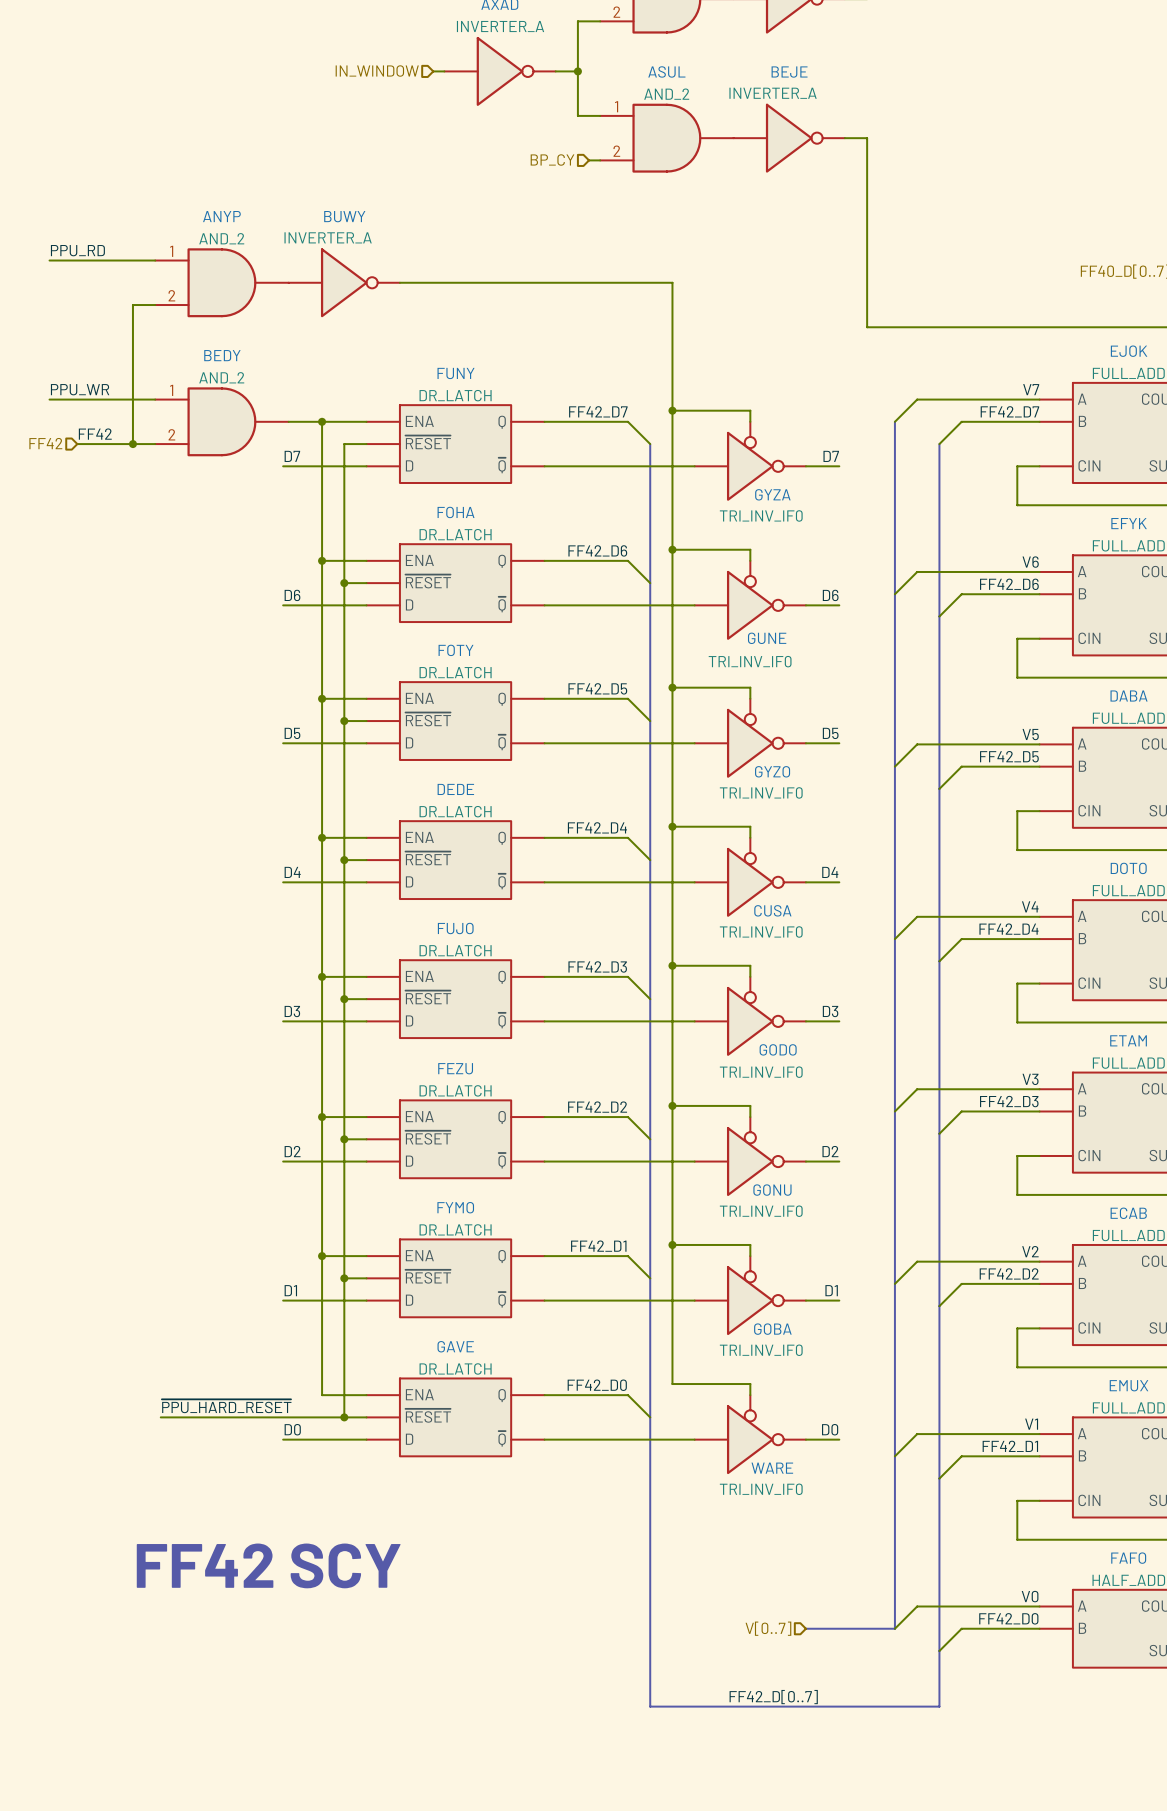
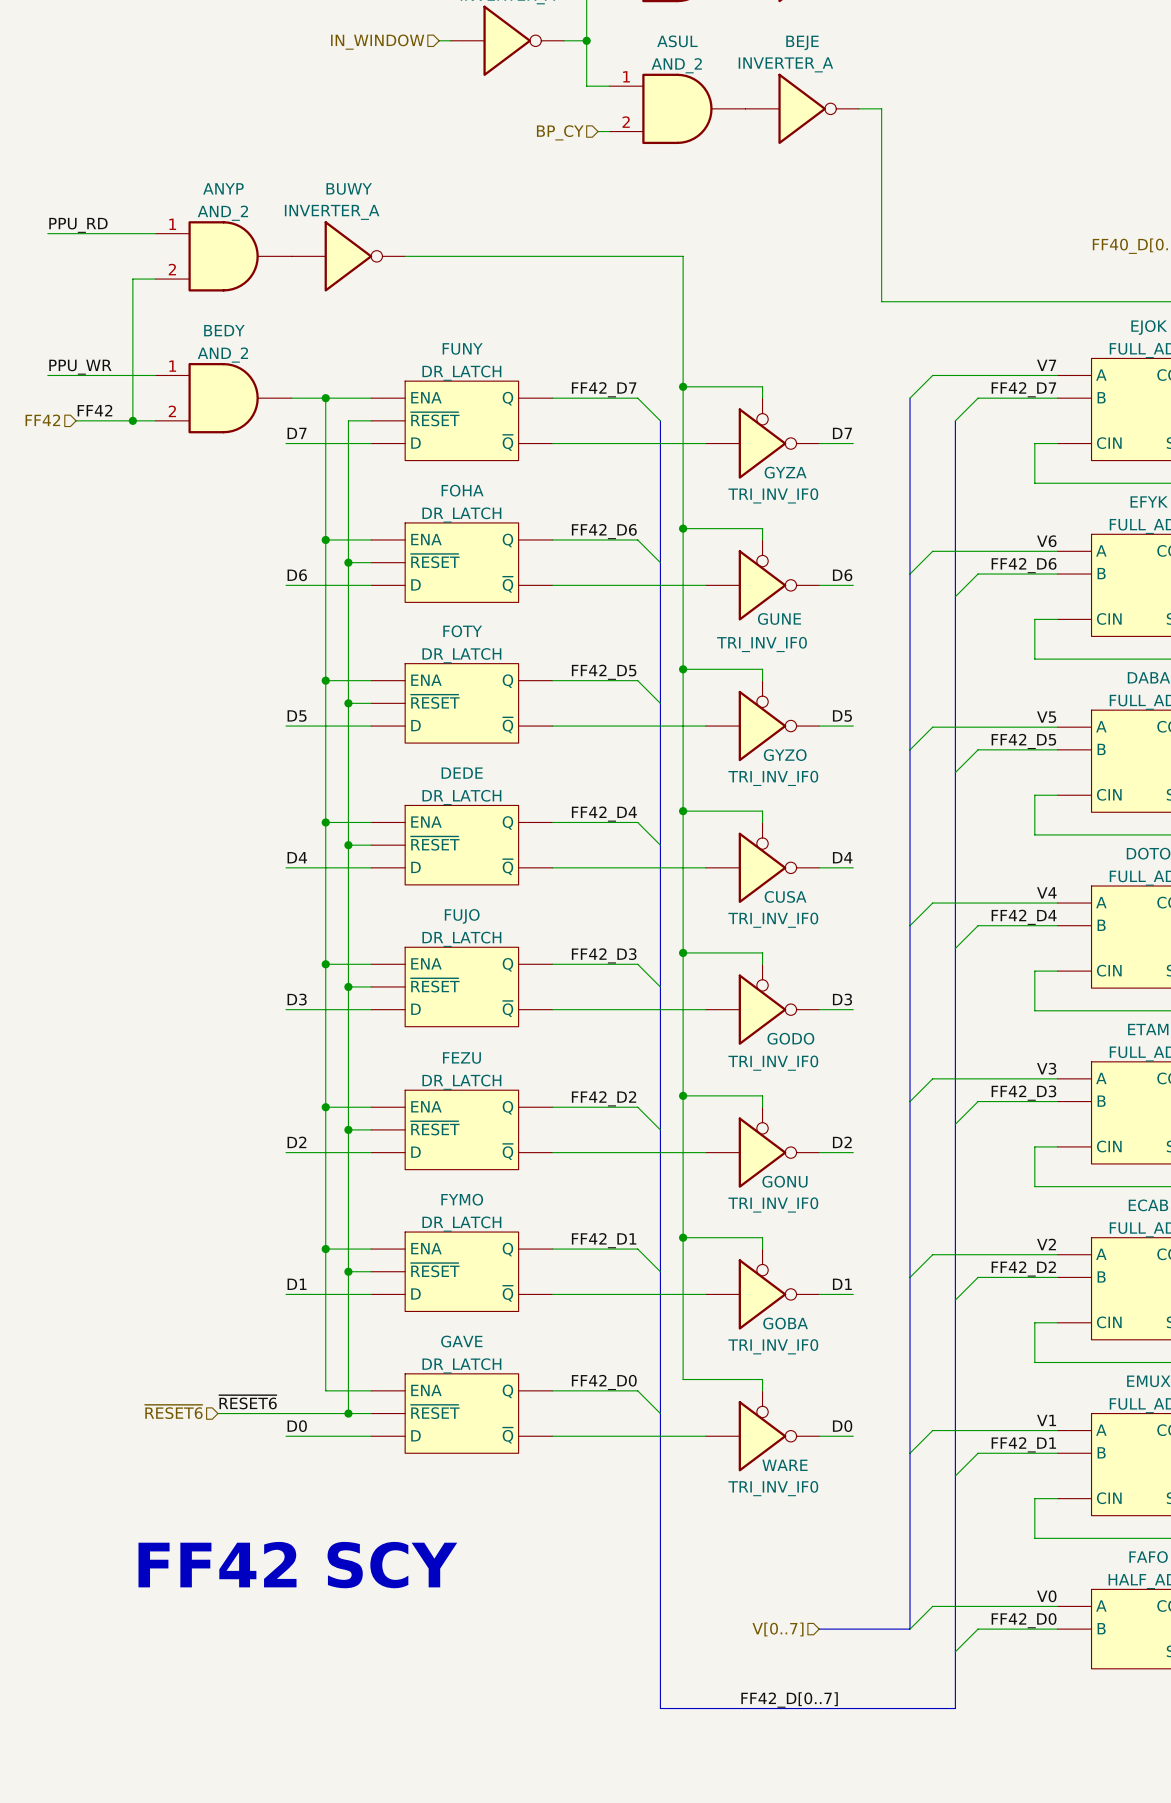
label: ~{PPU_HARD_RESET} (226, 1406) -> ~{RESET6} (247, 1402)
hierarchical label: none -> ~{RESET6} (173, 1411)
wire: (160, 1417) (216, 1417) -> none

